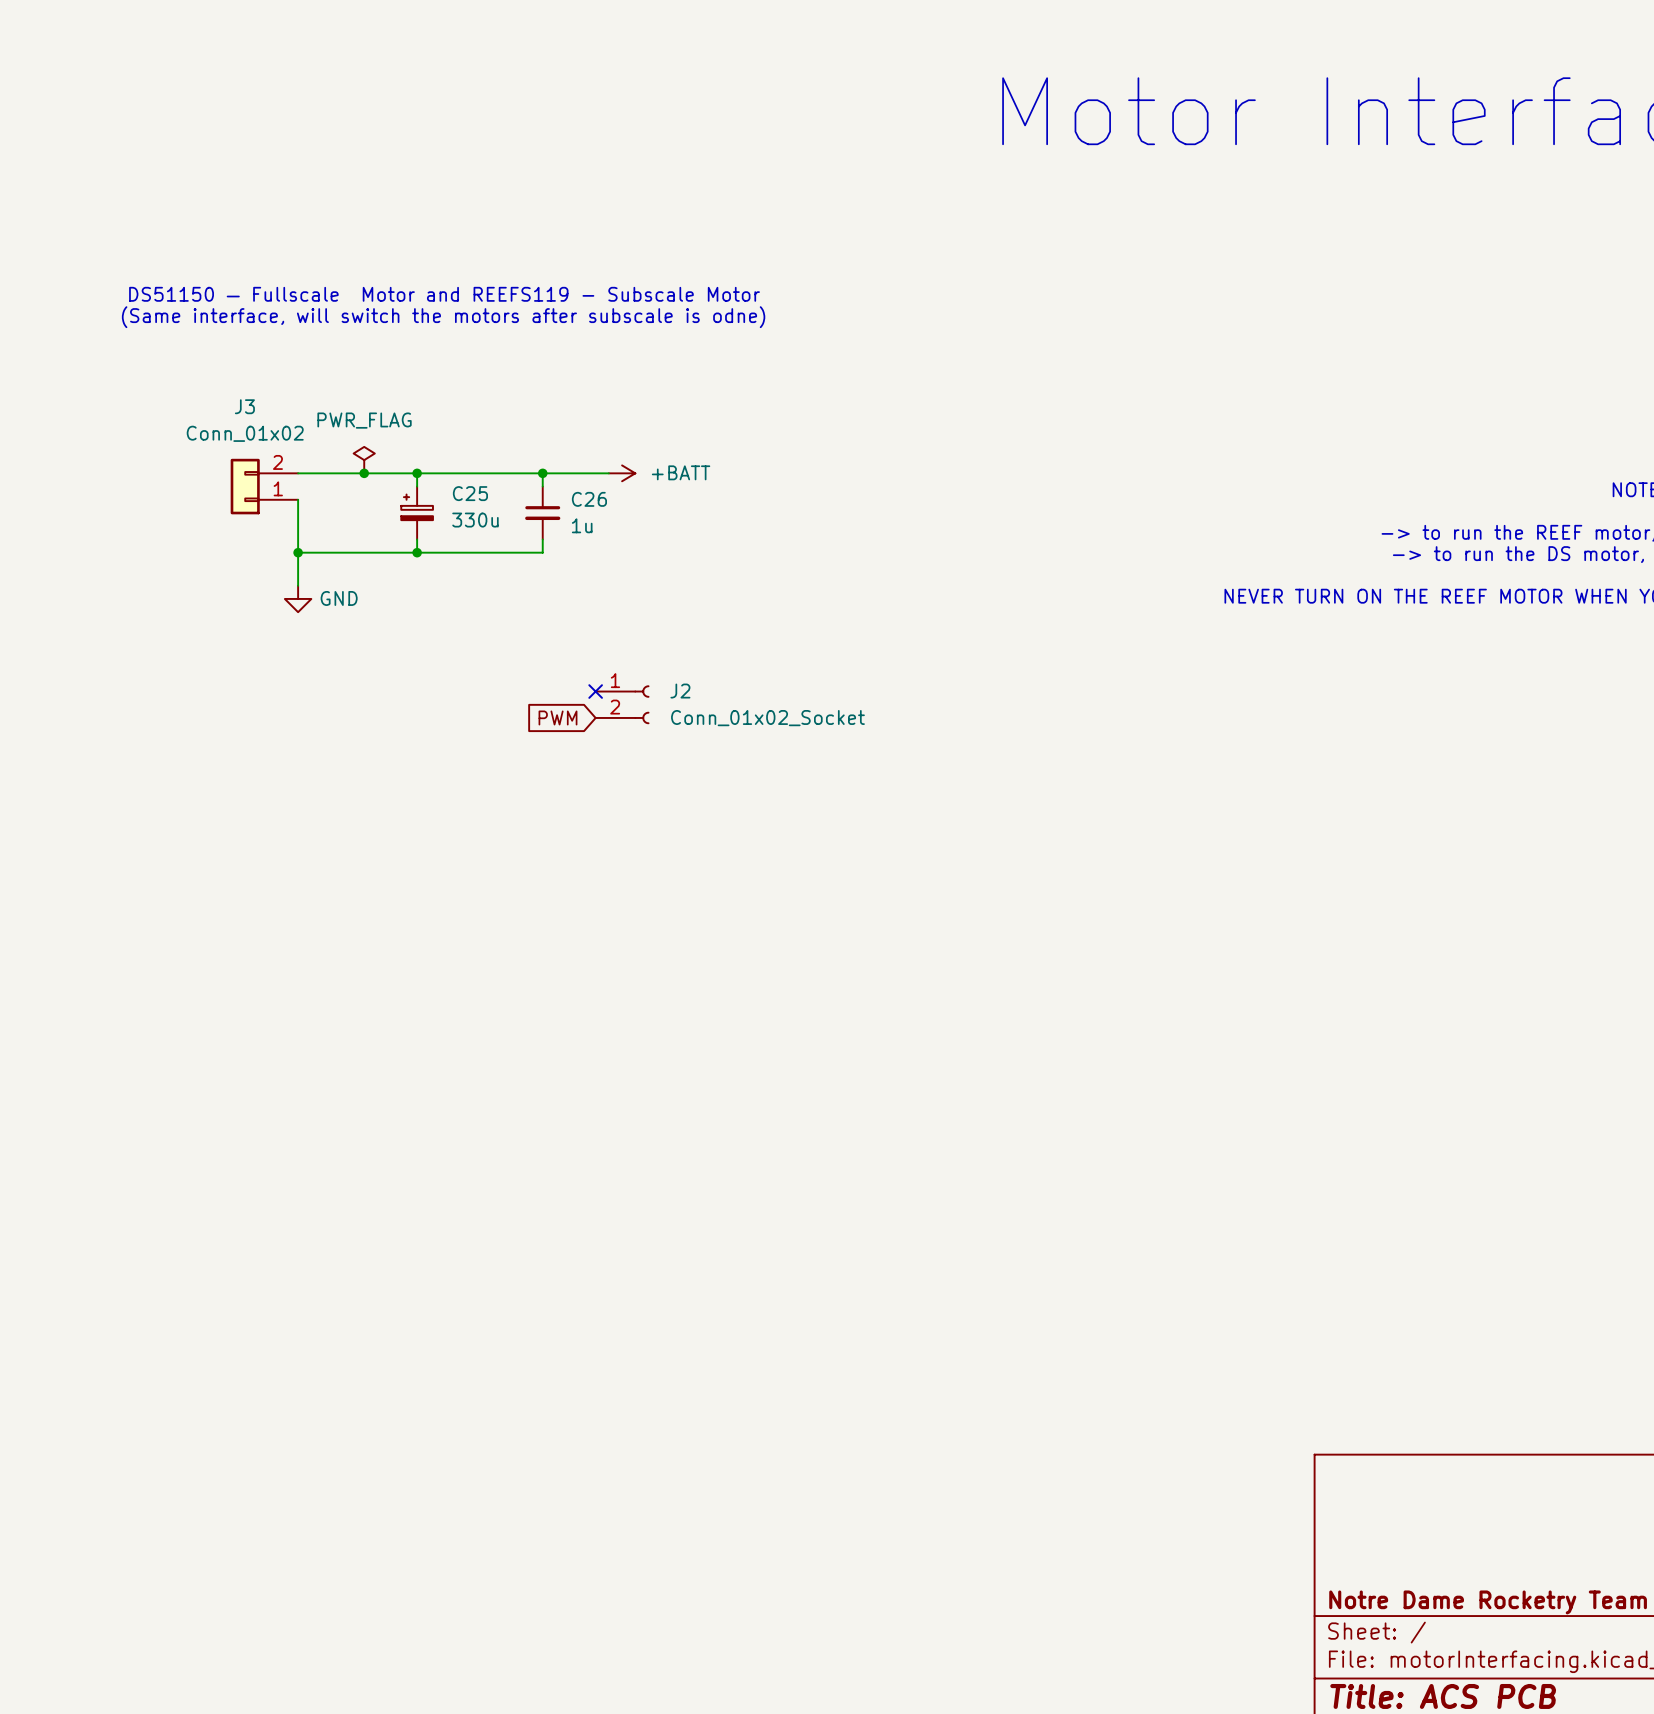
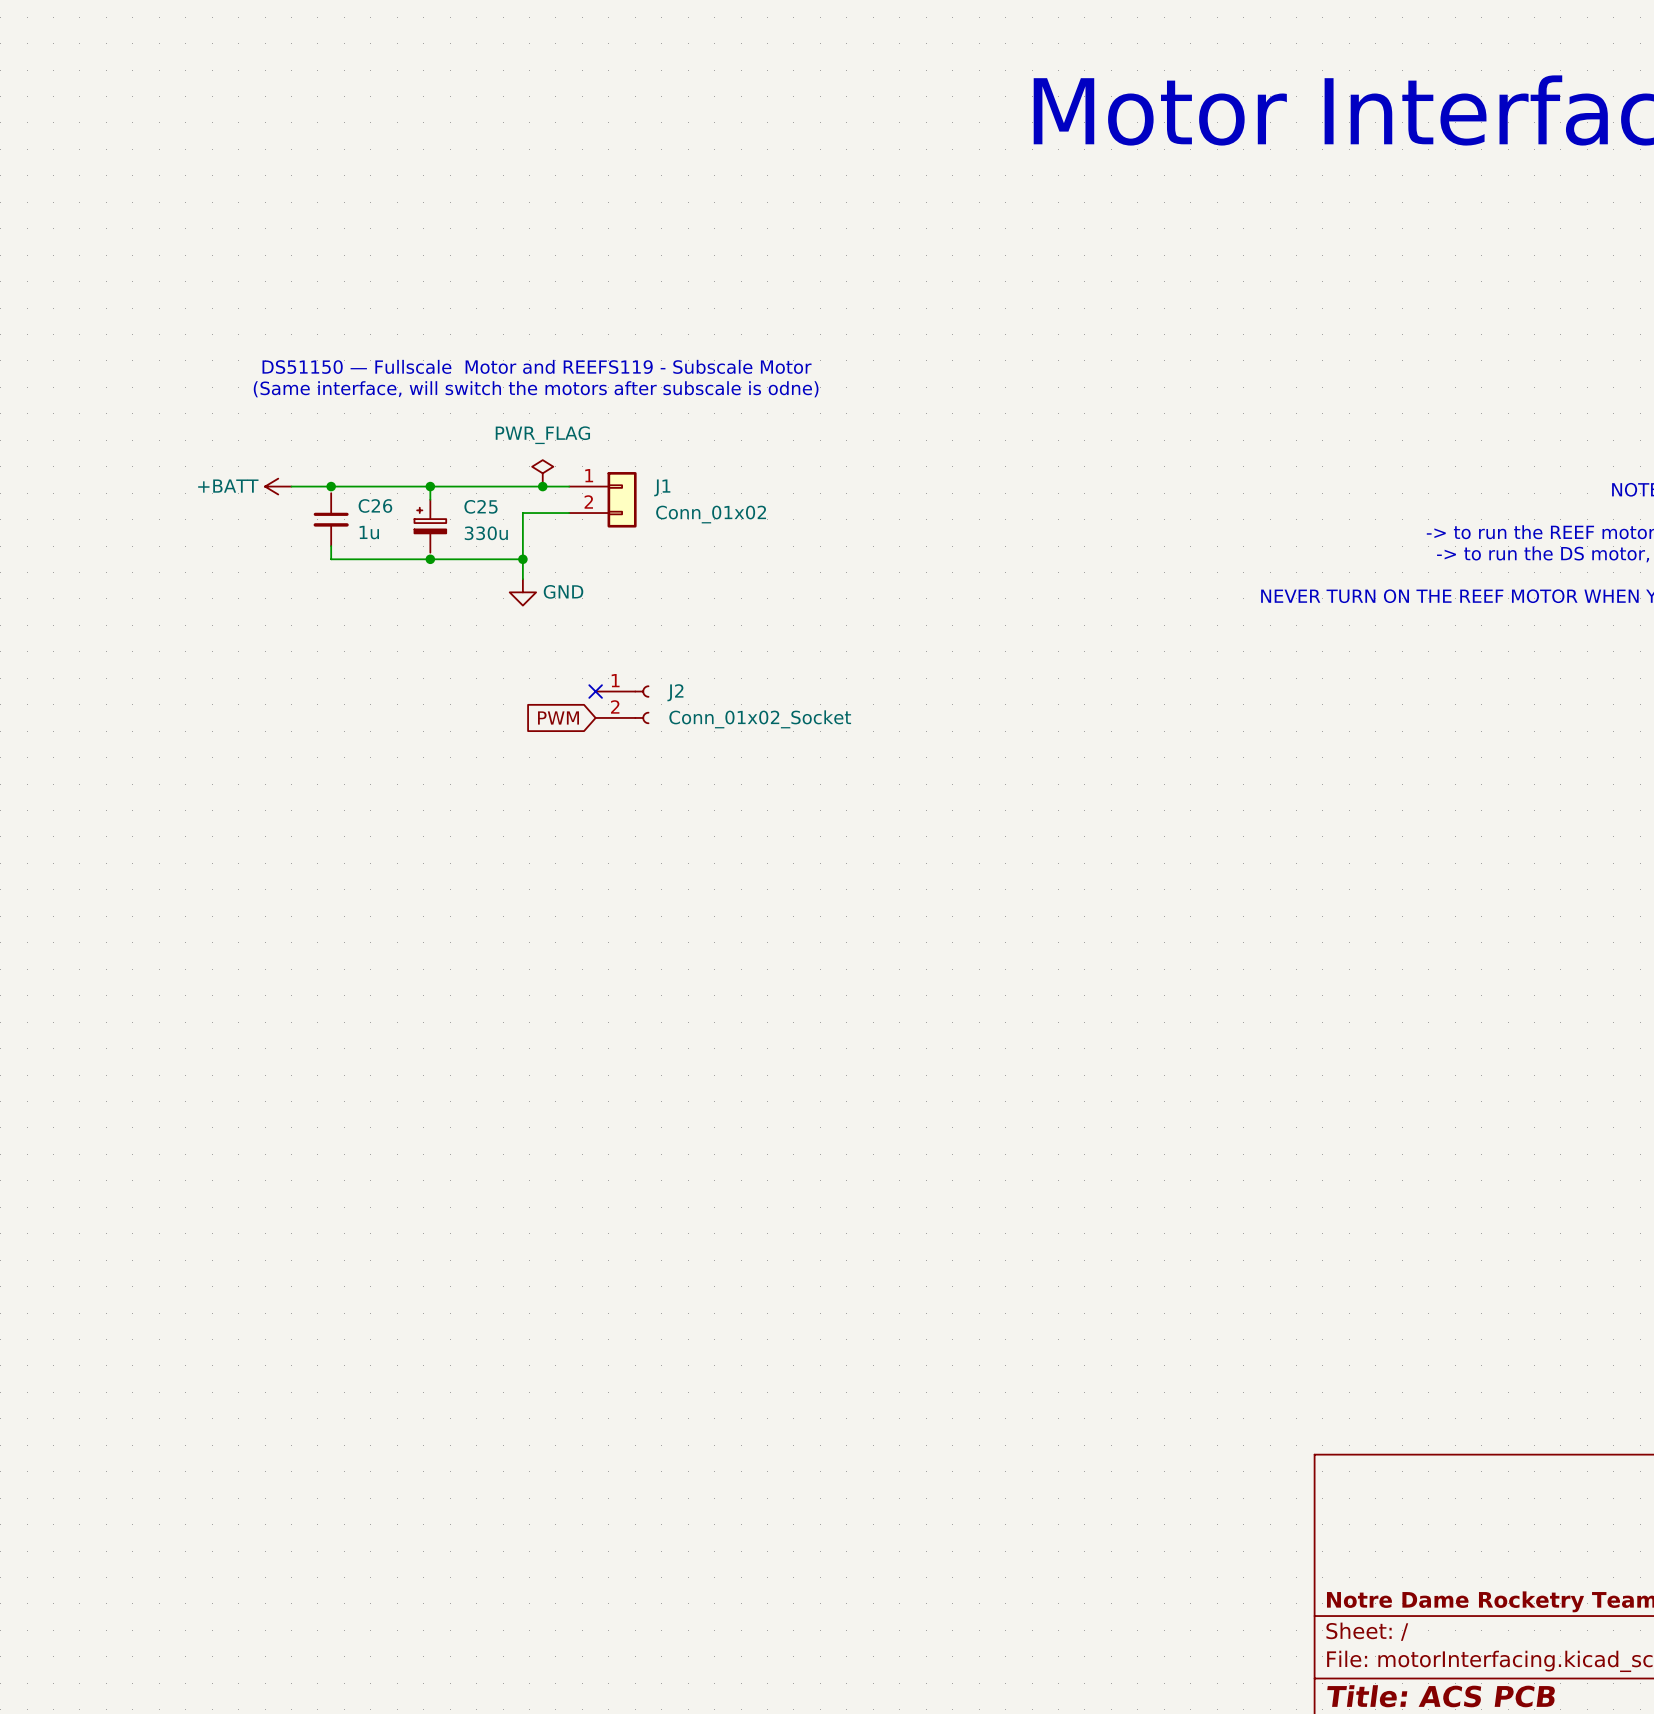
text position: DS51150 — Fullscale Motor and REEFS119 - Subscale Motor (444, 294) -> DS51150 — Fullscale Motor and REEFS119 - Subscale Motor (537, 366)
text position: (Same interface, will switch the motors after subscale is odne) (443, 317) -> (Same interface, will switch the motors after subscale is odne) (536, 389)
power symbol position: PWR_FLAG (364, 460) -> PWR_FLAG (542, 473)
wire: (298, 473) (608, 473) -> none
junction: (364, 473) -> none
wire: (417, 473) (417, 486) -> (430, 486) (430, 499)
junction position: (417, 473) -> (430, 486)
junction position: (542, 473) -> (542, 486)
power symbol: +BATT (622, 473) -> none
J3: Conn_01x02 (264, 486) -> none
power symbol: none -> +BATT (278, 486)
wire: none -> (291, 486) (569, 486)
junction: none -> (331, 486)
wire: (298, 499) (298, 585) -> none
J1: none -> Conn_01x02 (602, 499)
C25 position: (417, 513) -> (430, 526)
C26 position: (542, 513) -> (331, 519)
wire: none -> (569, 513) (522, 513) (522, 579)
wire: (417, 539) (417, 552) -> none
wire: (542, 539) (542, 552) (298, 552) -> none
wire: none -> (331, 546) (331, 559) (522, 559)
junction: (298, 552) -> none
junction position: (417, 552) -> (430, 559)
junction: none -> (522, 559)
power symbol position: GND (298, 598) -> GND (522, 592)

